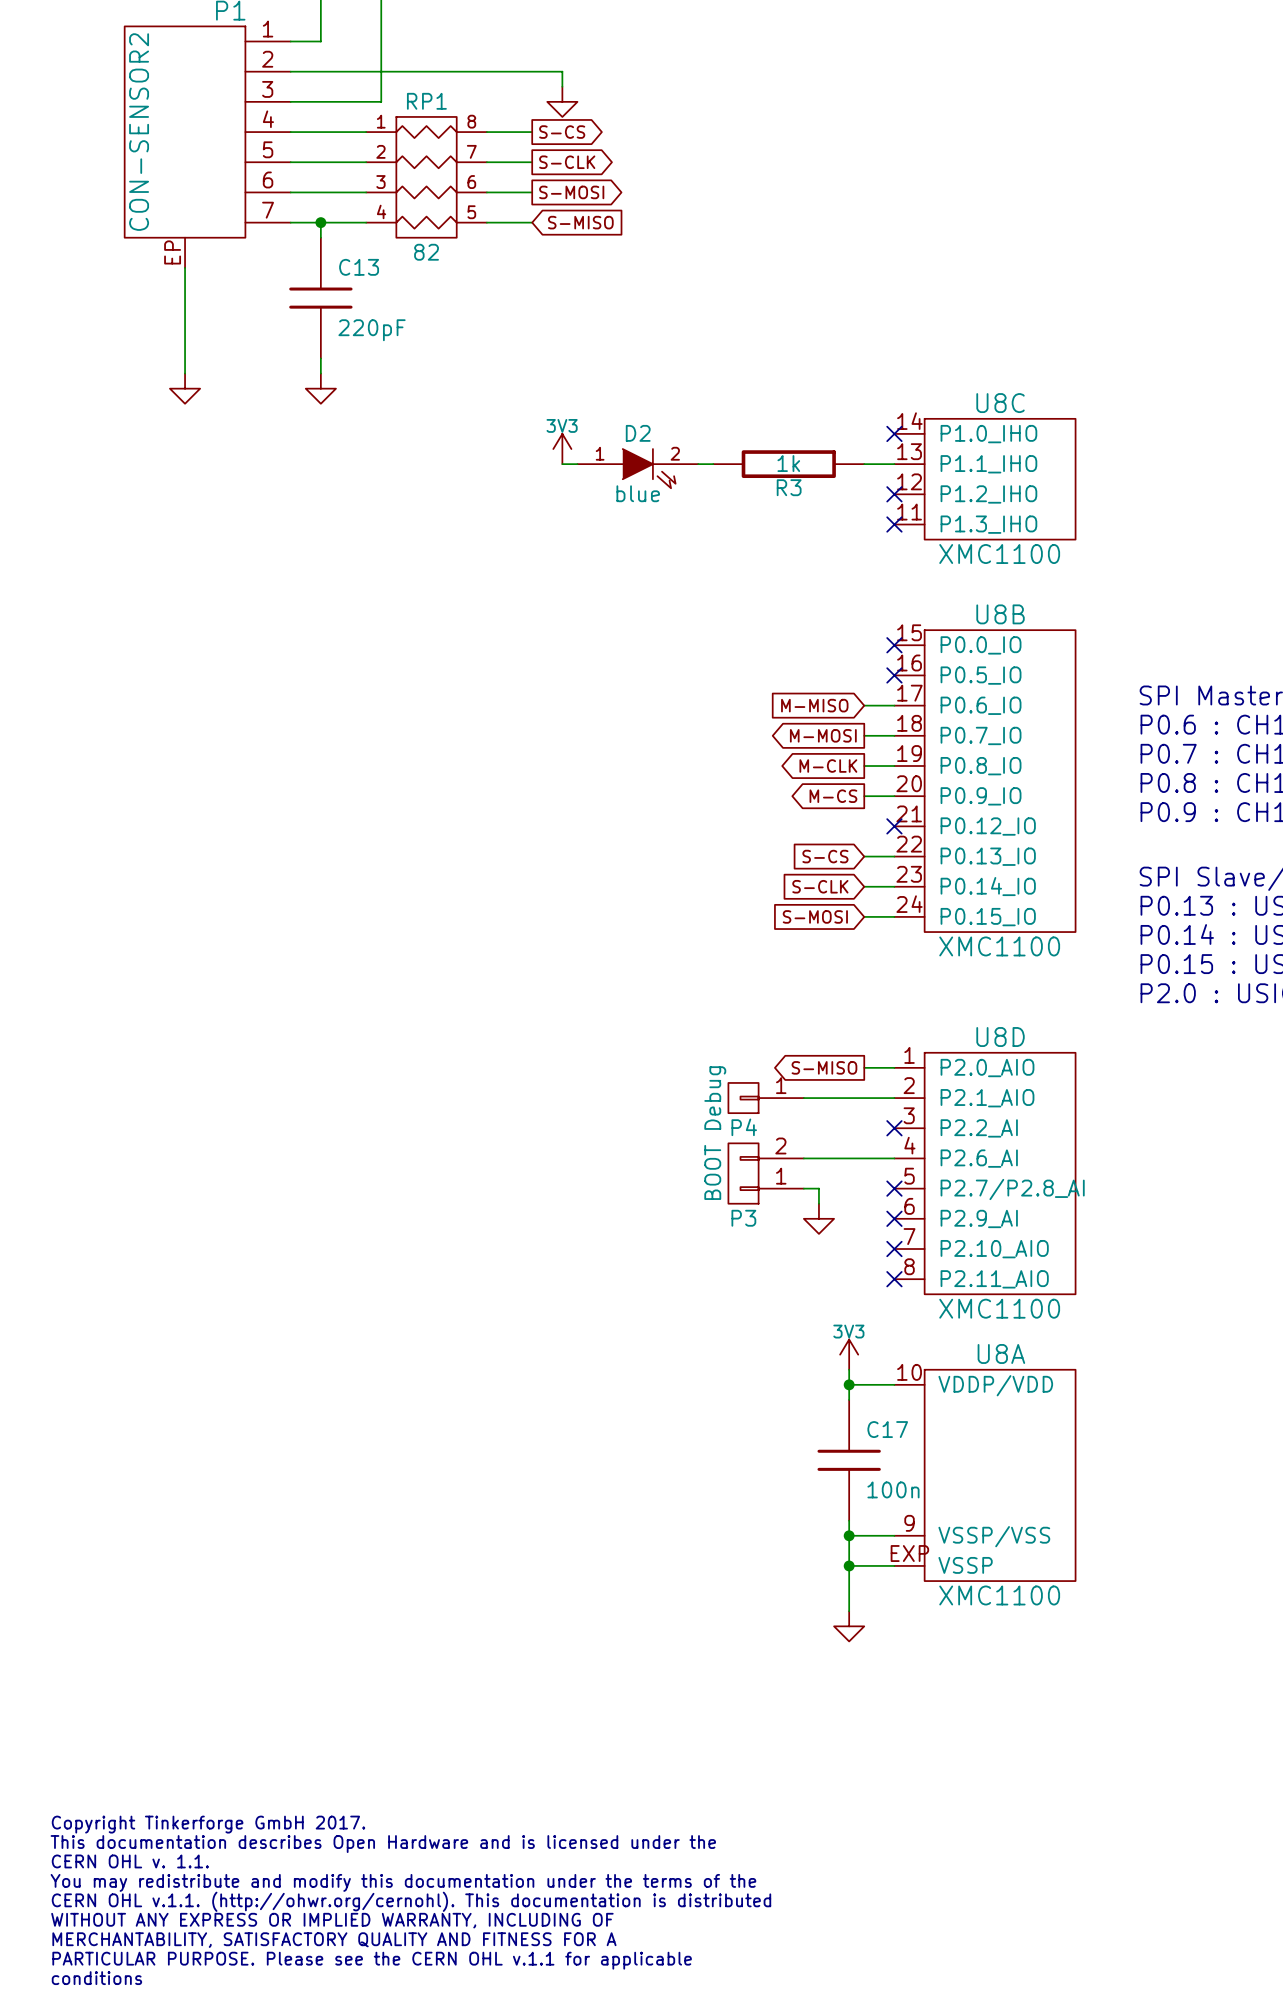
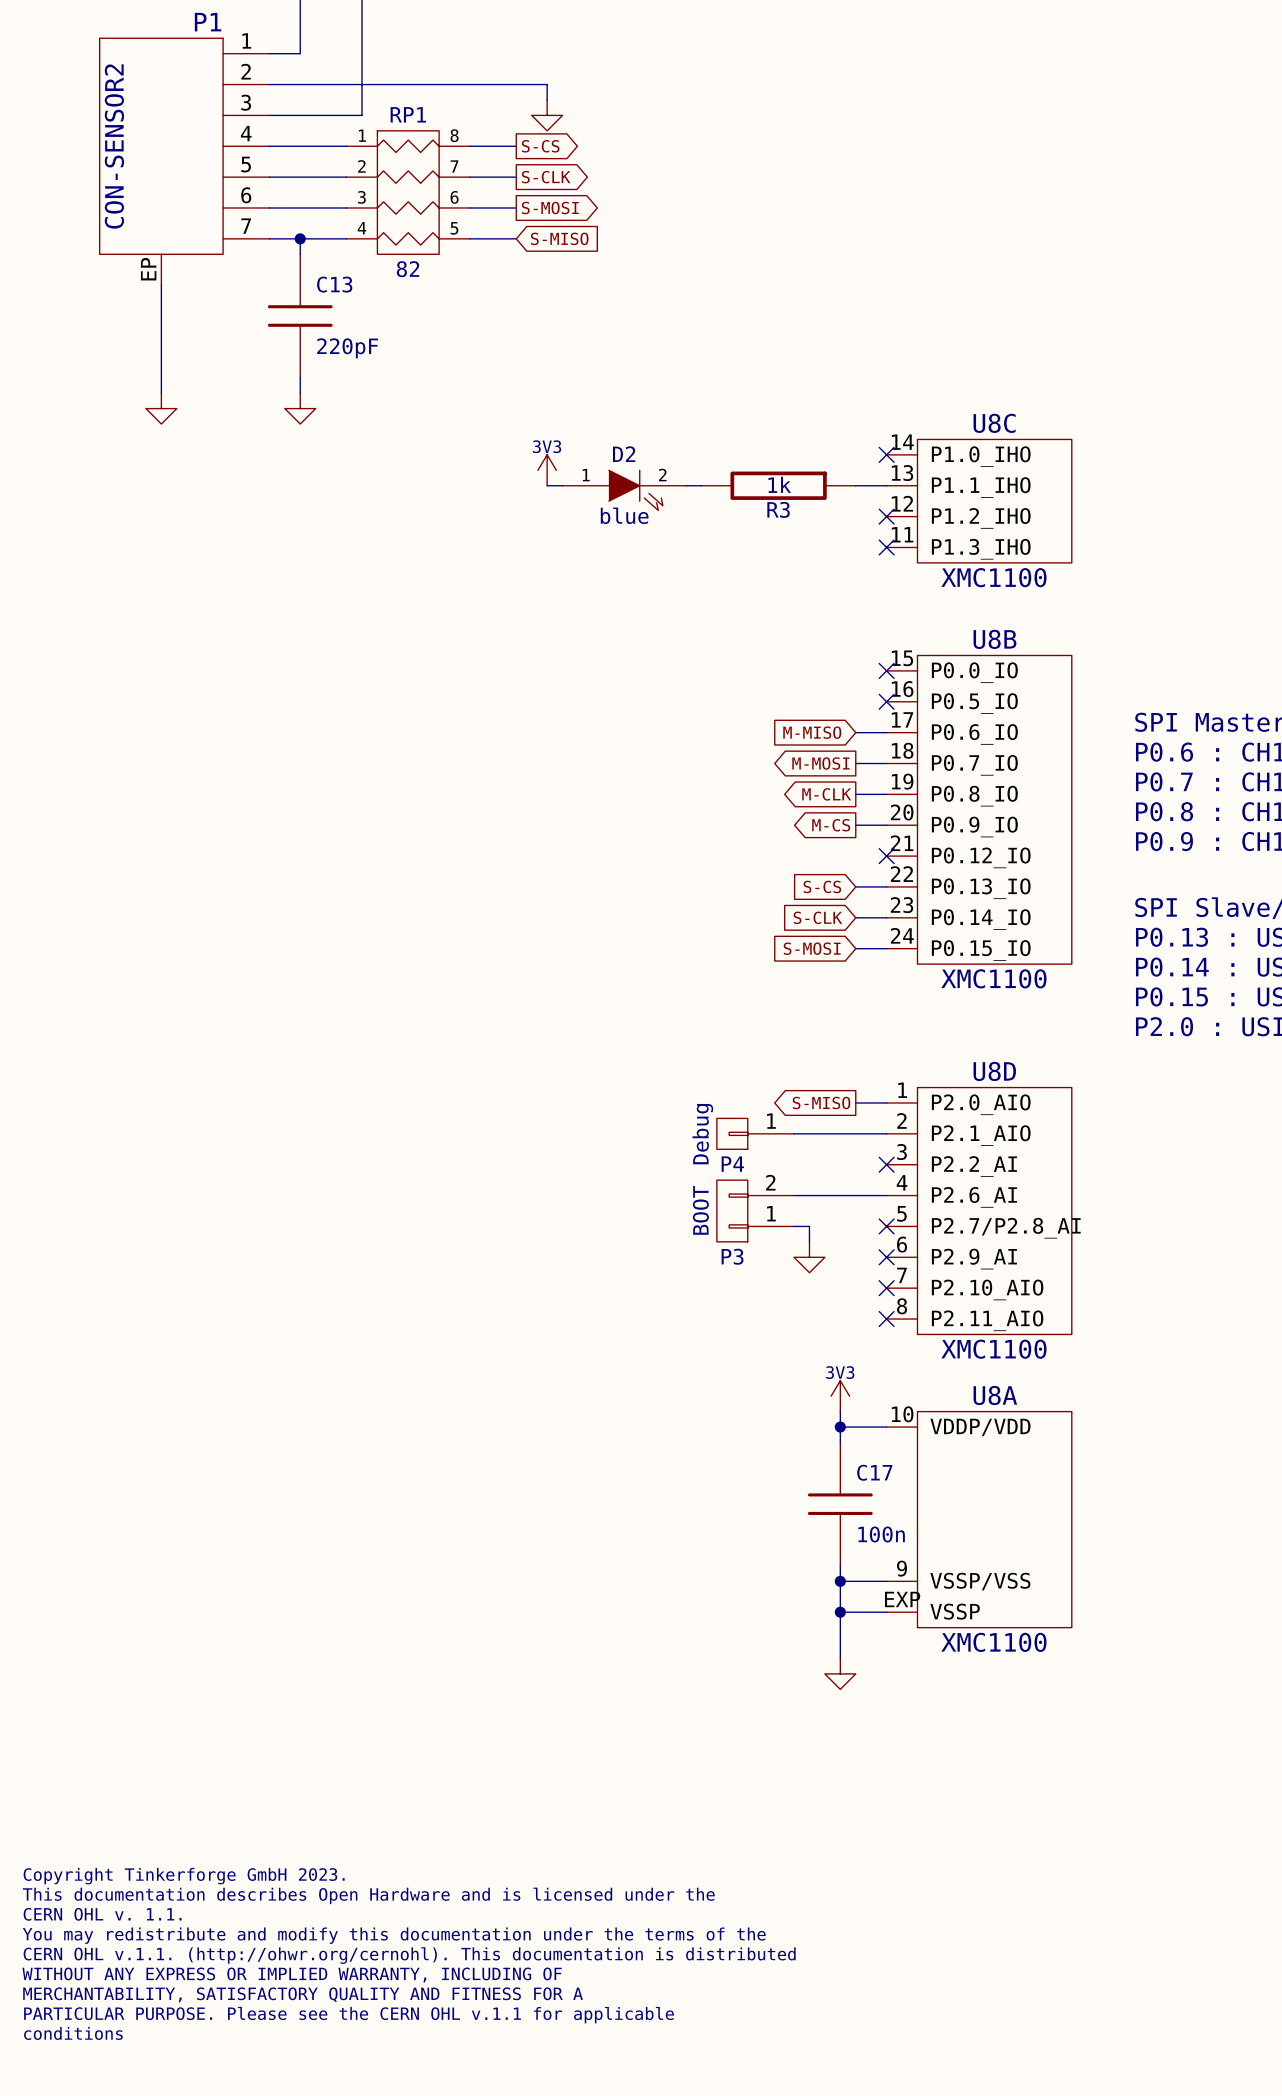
text: Copyright Tinkerforge GmbH 2017. (208, 1824) -> Copyright Tinkerforge GmbH 2023. (184, 1876)

